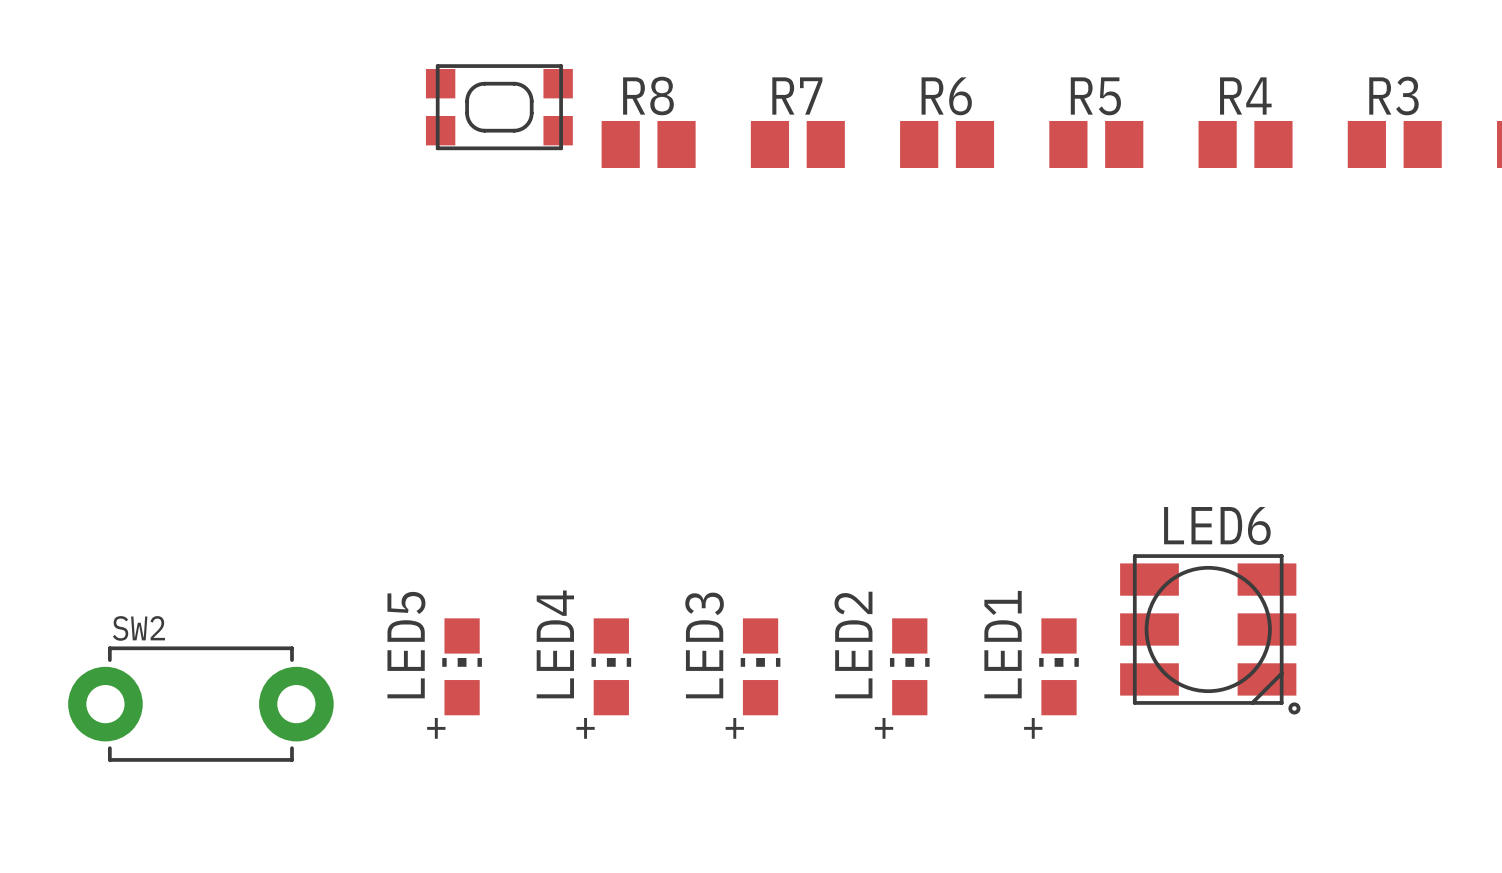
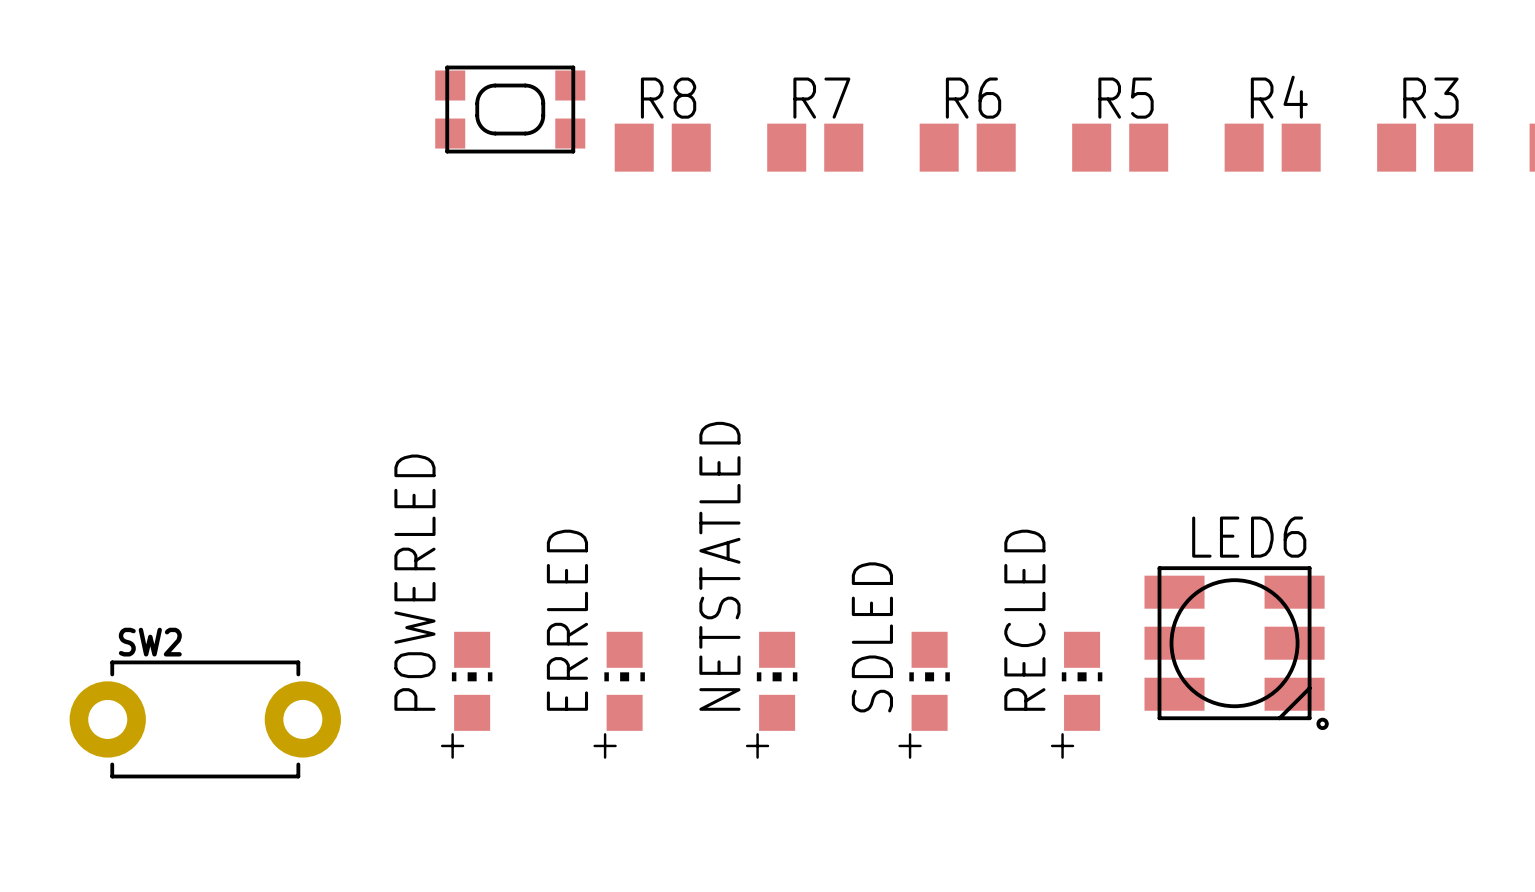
LED4 name: LED4 (555, 644) -> ERRLED (567, 620)
LED1 name: LED1 (1003, 644) -> RECLED (1024, 620)
LED5 name: LED5 (406, 645) -> POWERLED (414, 582)
LED3 name: LED3 (704, 645) -> NETSTATLED (719, 566)
LED2 name: LED2 (853, 645) -> SDLED (872, 637)

